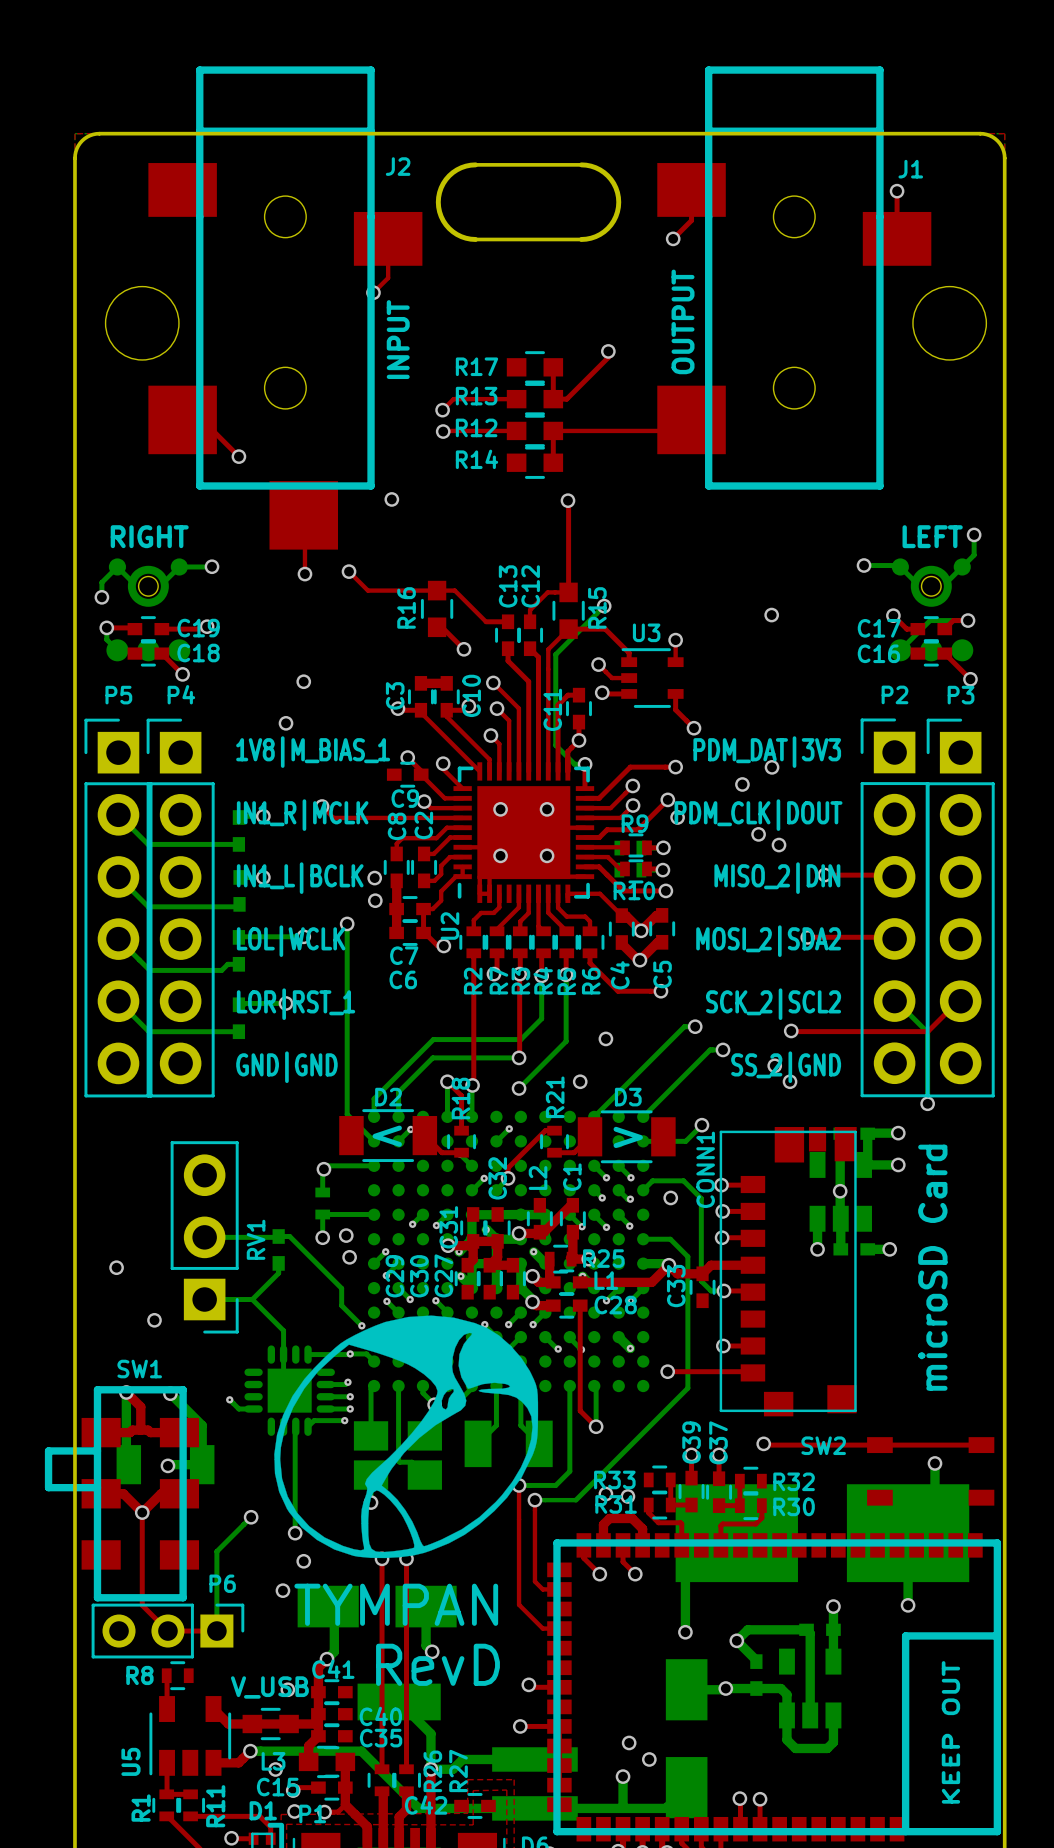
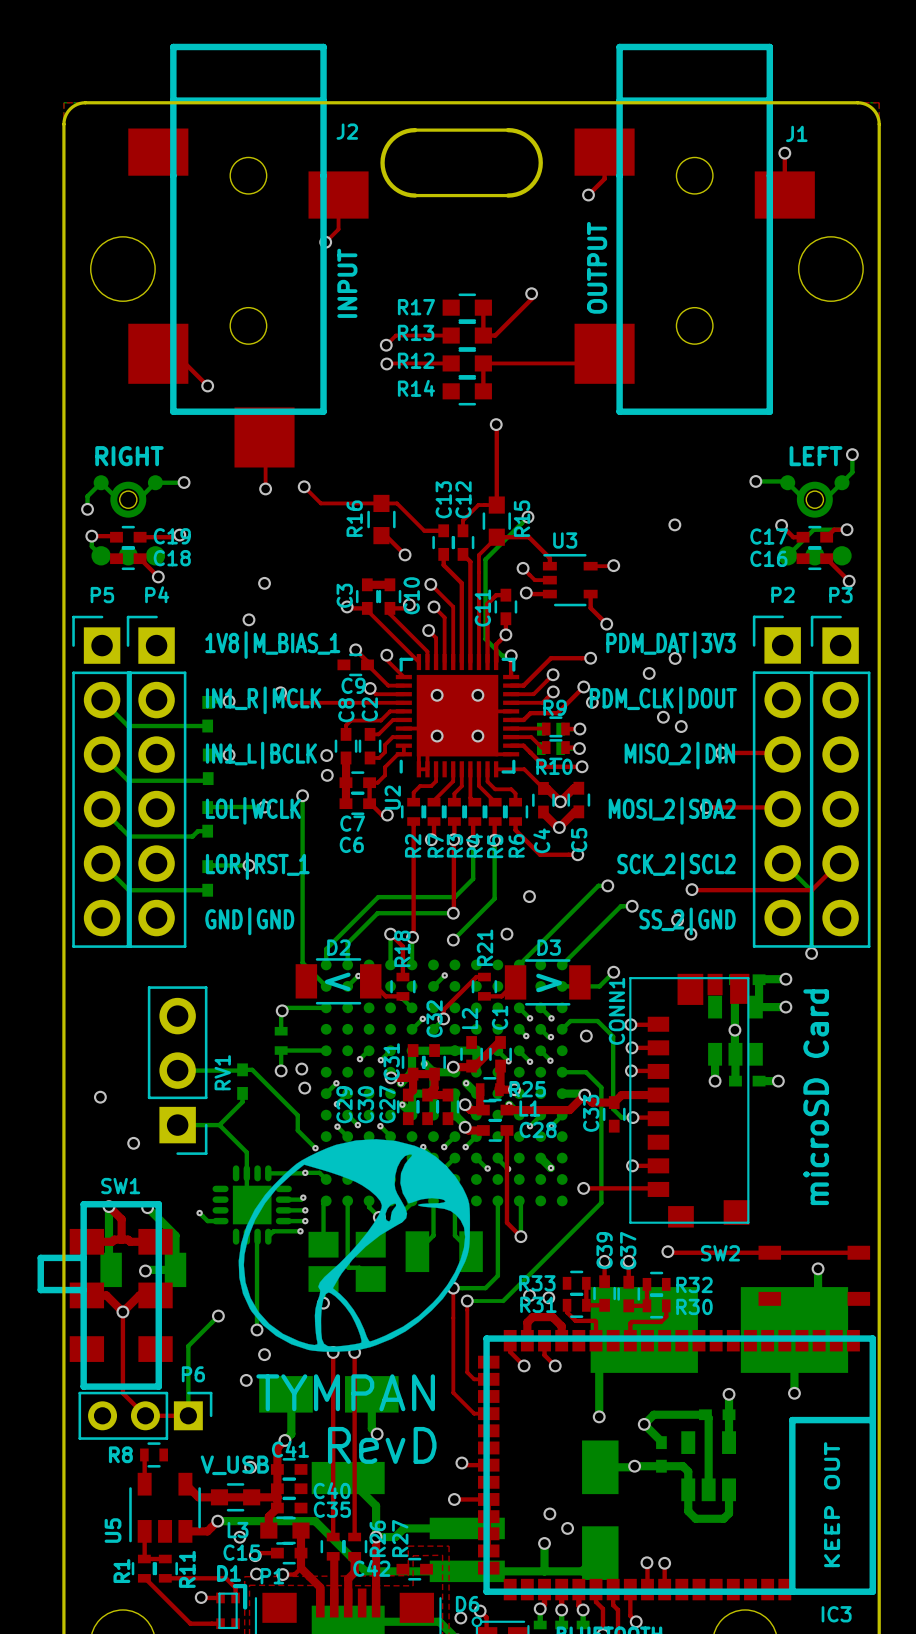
via: (391, 499) -> none
top track: (675, 640) (675, 662) -> (613, 565) (590, 566)
via position: (675, 640) -> (613, 565)

